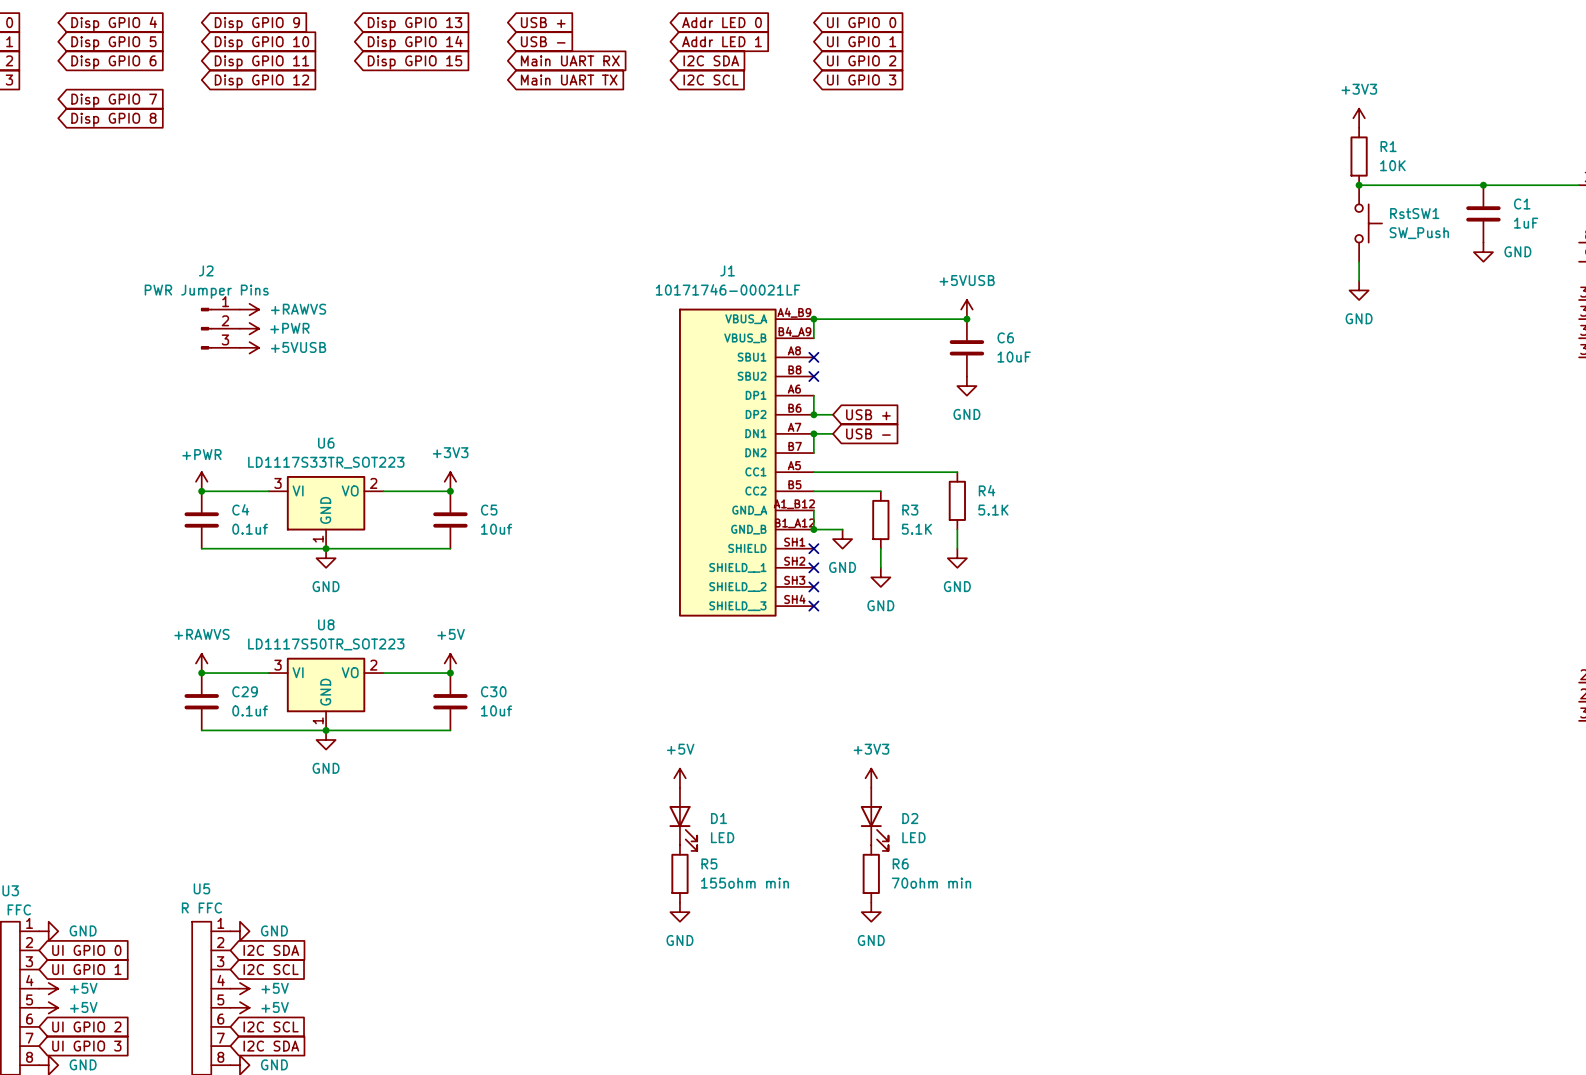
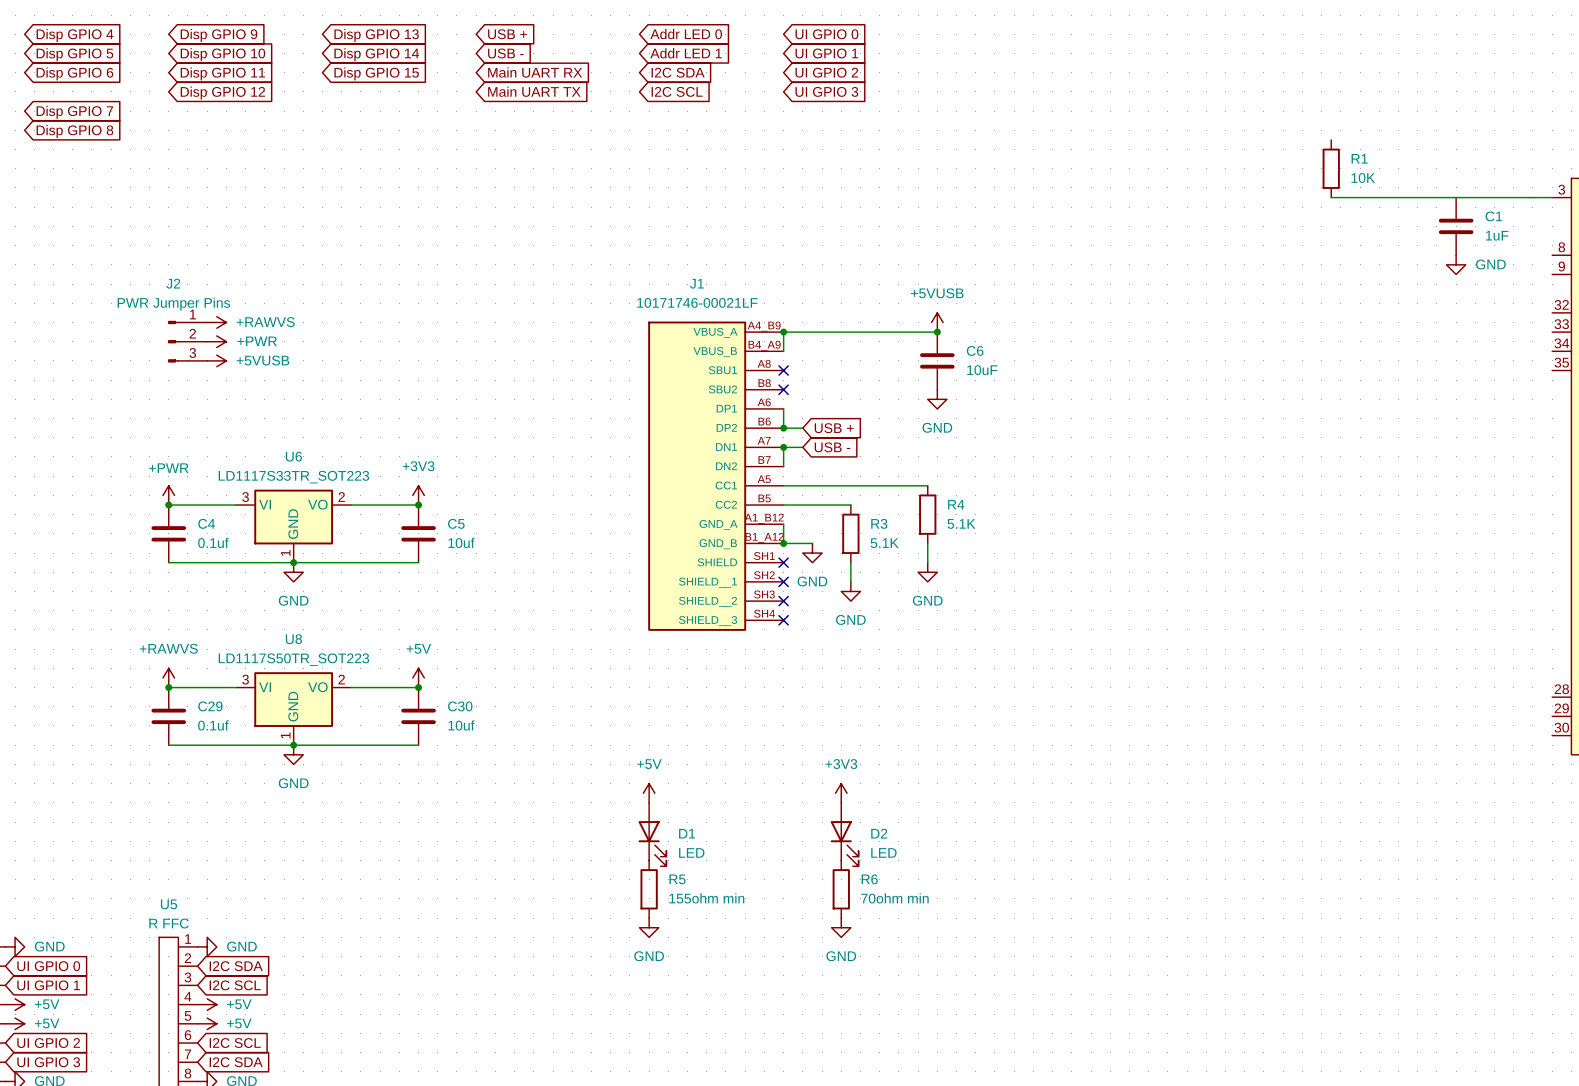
power symbol: +3V3 (1359, 118) -> none
junction: (1359, 185) -> none
junction: (1483, 185) -> none
RstSW1: SW_Push (1368, 223) -> none
wire: (1359, 261) (1359, 280) -> none
power symbol: GND (1359, 290) -> none

